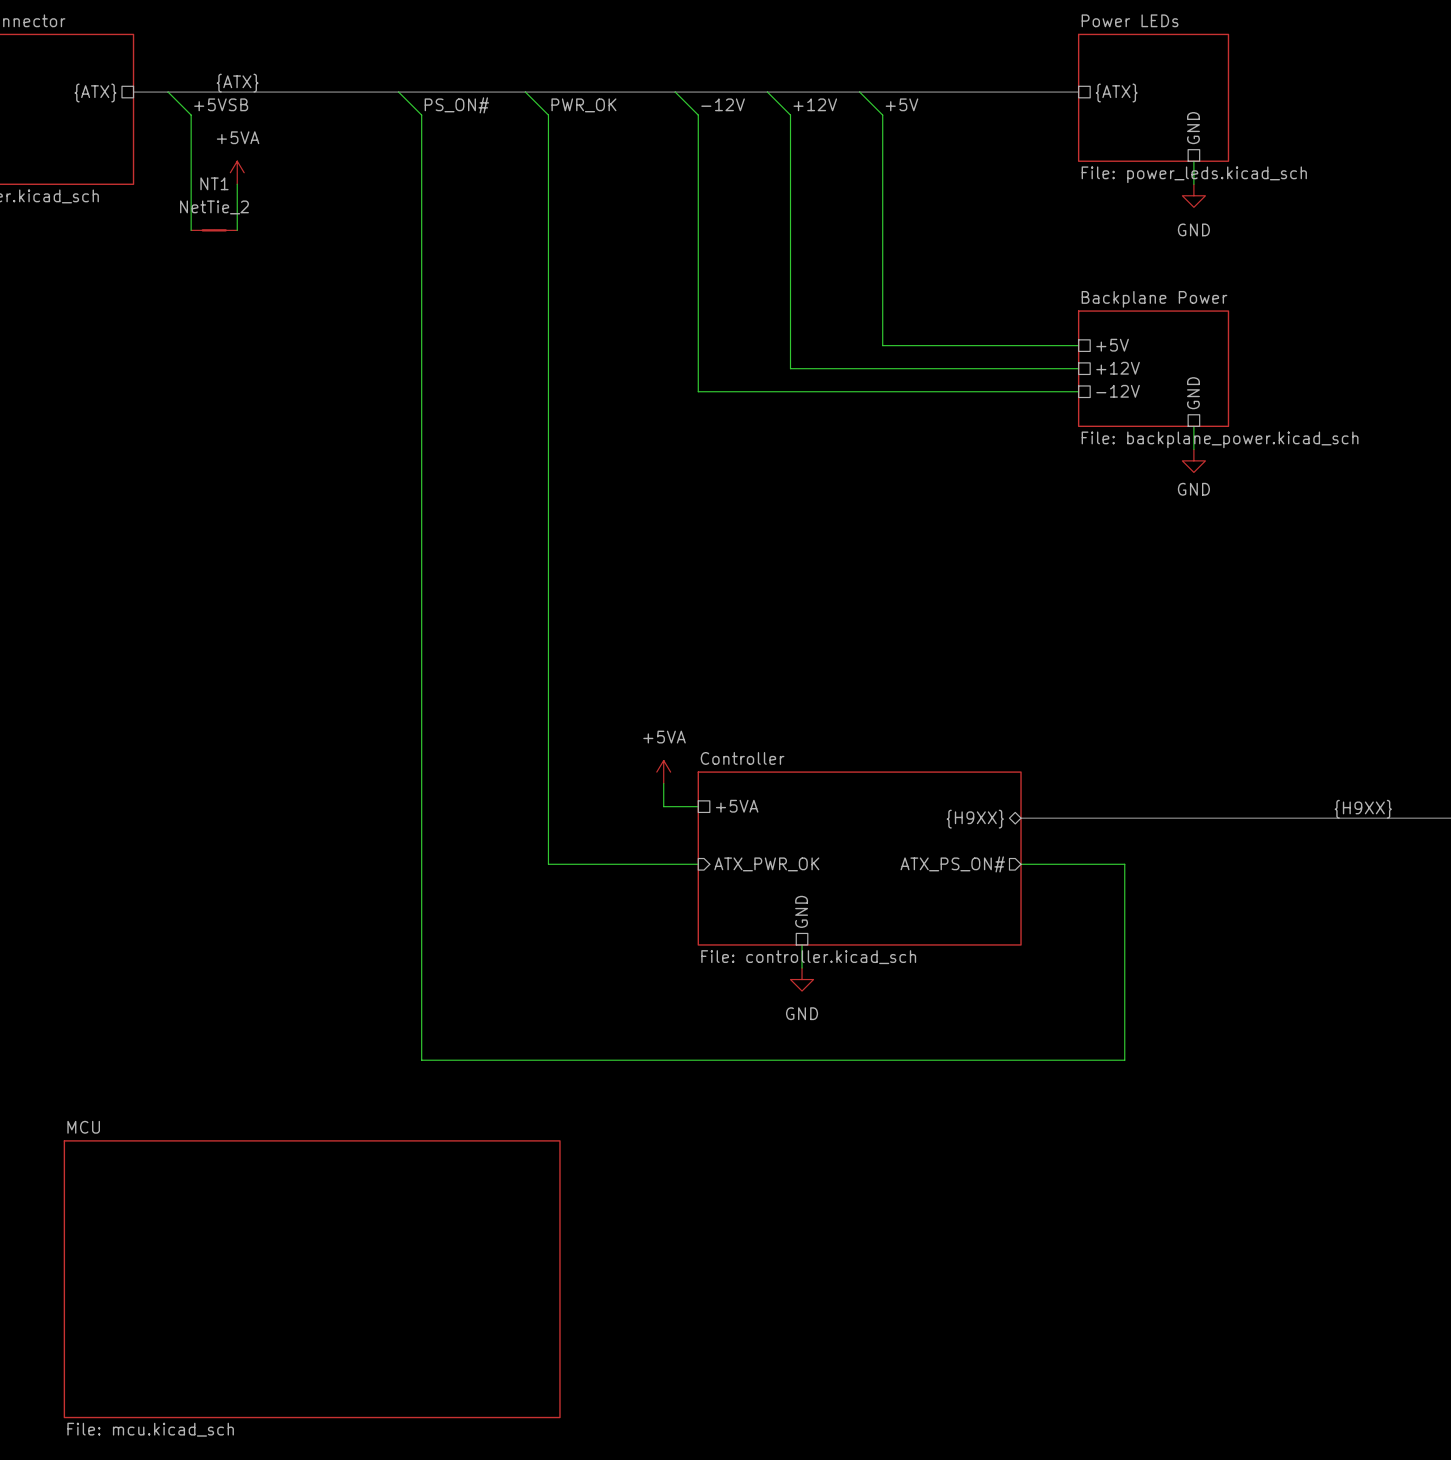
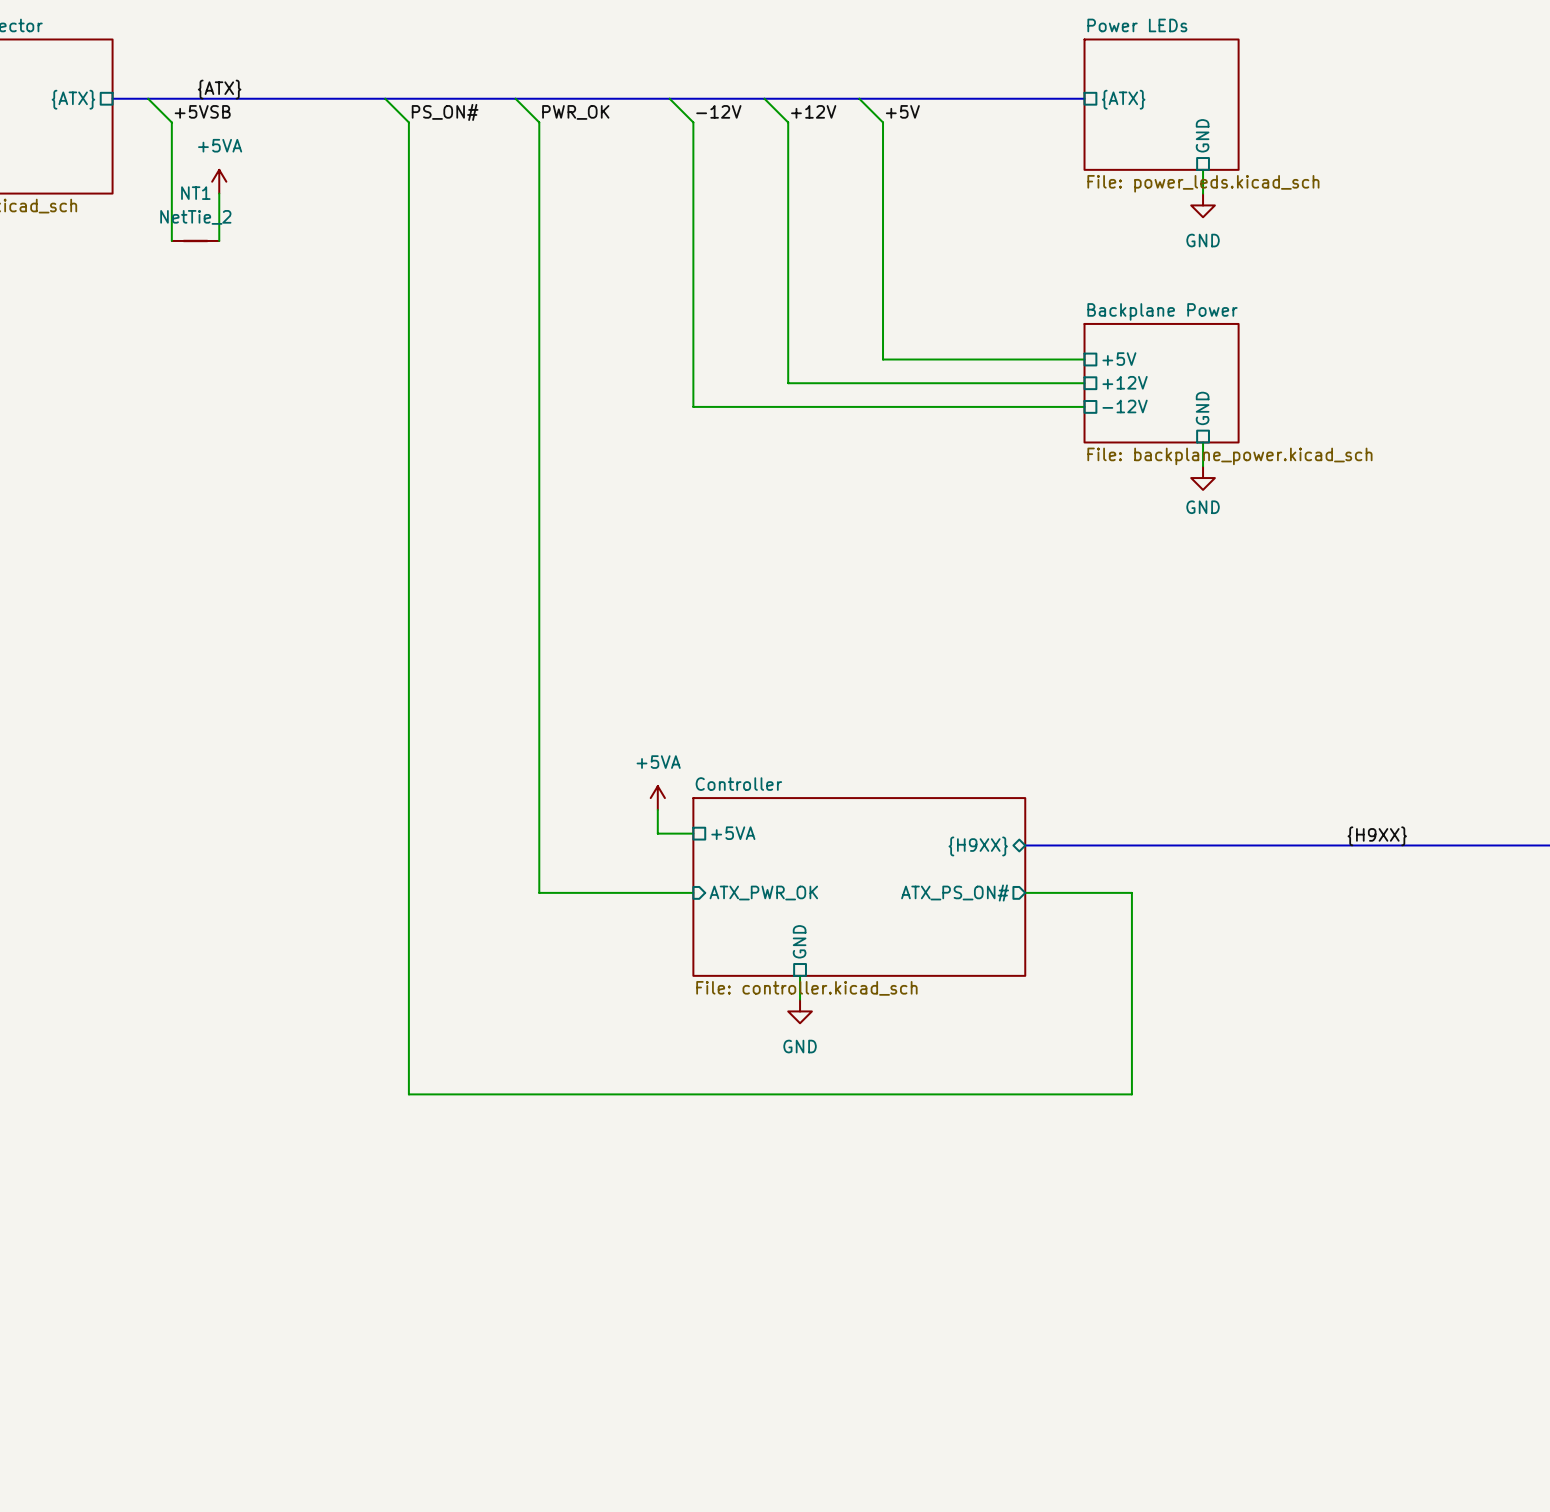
sheet MCU: File: mcu.kicad_sch (312, 1279) -> none

